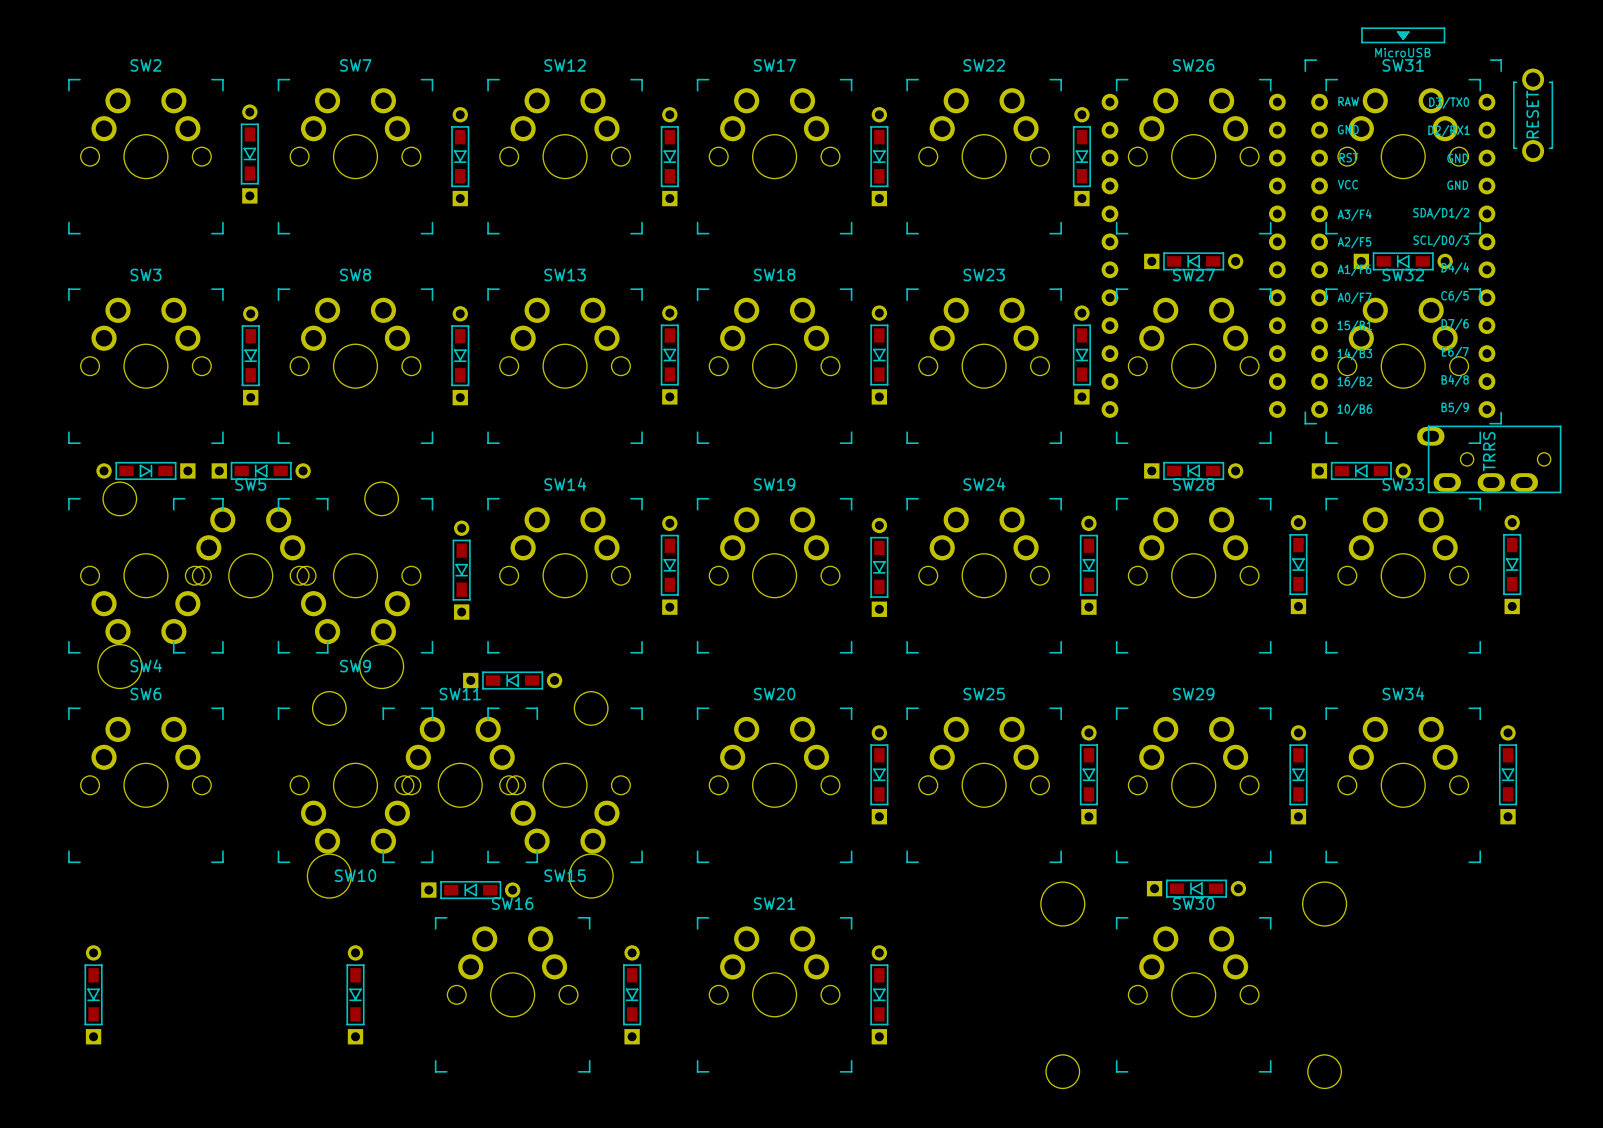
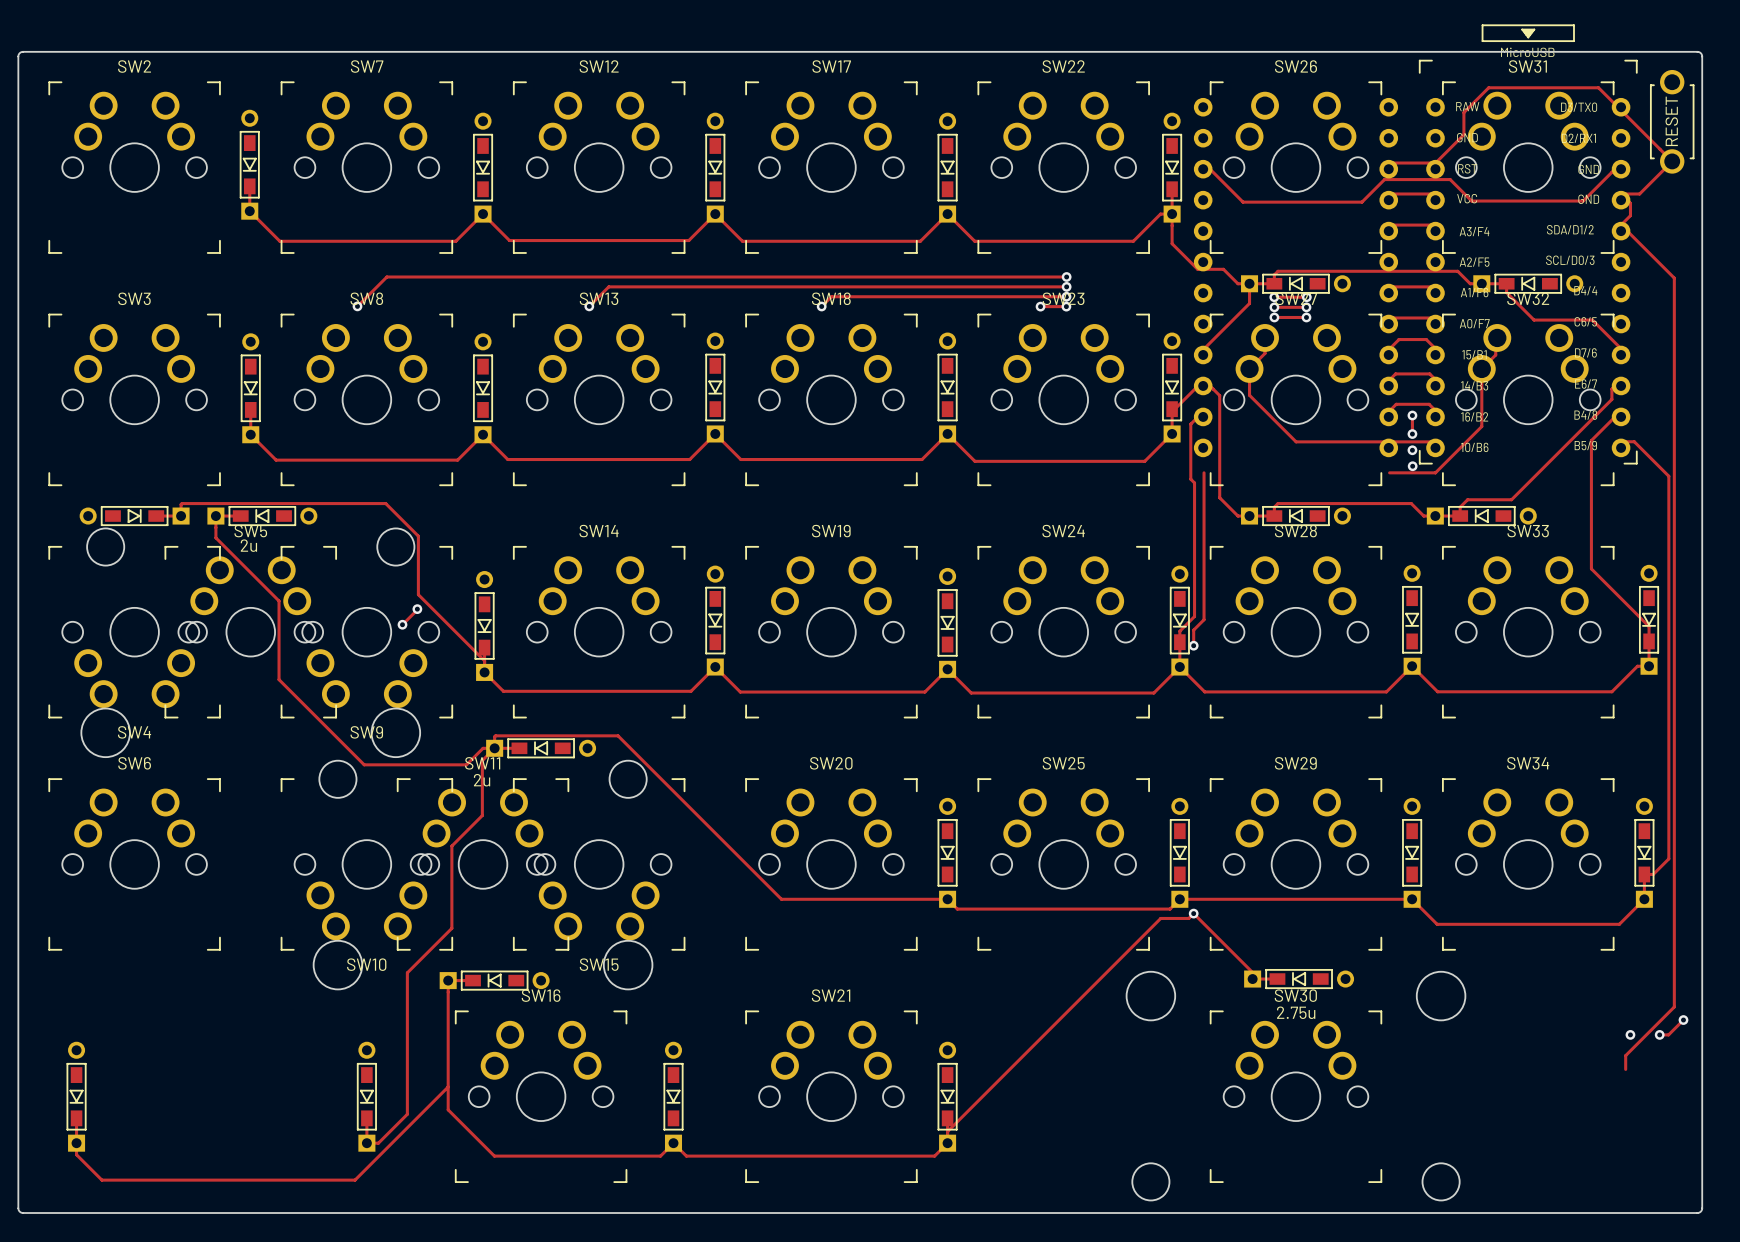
board edge: none -> (23, 51) (1700, 52) (1702, 56) (1701, 1211) (1697, 1213) (20, 1212) (18, 1208) (18, 56) (23, 51)
track: none -> (1389, 163) (1435, 163) (1463, 134) (1463, 112) (1488, 87) (1598, 87) (1672, 161) (1639, 193) (1621, 193) (1630, 203) (1630, 215) (1621, 224) (1674, 278) (1674, 1006) (1625, 1055) (1625, 1069)
track: none -> (1621, 163) (1583, 201) (1471, 201) (1450, 179) (1384, 179) (1361, 202) (1243, 202) (1204, 163)
track: none -> (249, 186) (249, 211) (279, 241) (455, 241) (483, 214) (509, 240) (688, 240) (715, 214) (742, 241) (920, 241) (947, 214) (974, 241) (1133, 241) (1160, 214) (1172, 214)
track: none -> (1172, 189) (1172, 243) (1197, 269) (1223, 269) (1237, 283) (1274, 283) (1274, 274) (1277, 271) (1457, 271) (1470, 283) (1506, 283) (1506, 292) (1534, 320) (1592, 320) (1621, 348)
track: none -> (1389, 193) (1435, 193)
track: none -> (1389, 225) (1435, 225)
track: none -> (1066, 277) (386, 277) (357, 306)
via: none -> (1066, 277)
track: none -> (1249, 283) (1249, 303) (1204, 348)
track: none -> (1066, 286) (608, 286) (589, 306)
via: none -> (1066, 286)
track: none -> (1389, 286) (1435, 286)
track: none -> (1066, 296) (831, 296) (821, 306)
via: none -> (1066, 296)
track: none -> (1274, 297) (1306, 297)
via: none -> (1274, 297)
via: none -> (1306, 297)
via: none -> (357, 306)
via: none -> (589, 306)
via: none -> (821, 306)
track: none -> (1040, 306) (1066, 306)
via: none -> (1040, 306)
via: none -> (1066, 306)
track: none -> (1274, 307) (1306, 307)
via: none -> (1274, 307)
via: none -> (1306, 307)
track: none -> (1274, 317) (1306, 317)
via: none -> (1274, 317)
via: none -> (1306, 317)
track: none -> (1389, 317) (1435, 317)
track: none -> (1265, 337) (1265, 353) (1249, 368) (1249, 395) (1296, 441) (1435, 441)
track: none -> (1497, 337) (1495, 354) (1481, 368) (1481, 426) (1435, 472) (1389, 472)
track: none -> (1435, 348) (1426, 339) (1399, 339) (1389, 348)
track: none -> (1435, 379) (1429, 373) (1395, 373) (1389, 379)
track: none -> (1621, 379) (1611, 389) (1611, 399) (1511, 499) (1467, 499) (1460, 507) (1460, 516) (1423, 516) (1411, 503) (1277, 503) (1274, 507) (1274, 516) (1237, 516) (1219, 497) (1219, 395) (1204, 379) (1174, 409) (1172, 409) (1172, 433) (1144, 461) (974, 461) (947, 433) (922, 459) (740, 459) (715, 433) (689, 459) (507, 459) (483, 434) (457, 460) (276, 460) (250, 434) (250, 409)
track: none -> (1435, 410) (1429, 404) (1396, 404) (1389, 410)
track: none -> (1621, 410) (1591, 440) (1591, 568) (1649, 626) (1649, 666) (1637, 666) (1611, 691) (1437, 691) (1412, 666) (1386, 691) (1204, 691) (1179, 667)
track: none -> (1204, 410) (1190, 424) (1190, 479) (1194, 482) (1194, 616) (1179, 631) (1179, 667)
track: none -> (1412, 415) (1412, 434)
via: none -> (1412, 415)
via: none -> (1412, 434)
track: none -> (1621, 441) (1634, 441) (1668, 476) (1668, 858) (1653, 874) (1644, 874) (1644, 899) (1619, 924) (1437, 924) (1412, 899) (1179, 899) (1170, 909) (957, 909) (947, 899) (781, 899) (618, 735) (495, 735) (494, 748) (482, 760) (482, 815) (451, 846) (451, 928) (407, 972) (407, 1114) (378, 1143) (366, 1143) (366, 1118)
via: none -> (1412, 450)
via: none -> (1412, 466)
track: none -> (1204, 472) (1204, 619) (1193, 630) (1193, 645)
part: (1489, 459) -> none
track: none -> (156, 516) (181, 516) (181, 503) (385, 503) (418, 536) (418, 594) (484, 660)
track: none -> (240, 516) (215, 516) (215, 537) (279, 601) (279, 679) (364, 764) (466, 764) (483, 748) (519, 748)
text: none -> 2u (248, 545)
track: none -> (417, 609) (402, 624)
via: none -> (417, 609)
via: none -> (402, 624)
via: none -> (1193, 645)
track: none -> (484, 647) (484, 672) (503, 691) (691, 691) (715, 667) (740, 692) (924, 692) (947, 669) (971, 693) (1153, 693) (1179, 667)
text: none -> 2u (482, 780)
via: none -> (1193, 913)
track: none -> (1277, 979) (1252, 979) (1252, 972) (1193, 913) (1188, 918) (1160, 918) (947, 1131)
track: none -> (473, 980) (448, 980) (448, 1109) (494, 1156) (660, 1156) (673, 1143) (686, 1156) (934, 1156) (947, 1143) (947, 1118)
text: none -> 2.75u (1296, 1012)
track: none -> (1683, 1020) (1668, 1034) (1659, 1034)
via: none -> (1683, 1020)
via: none -> (1630, 1034)
via: none -> (1659, 1034)
track: none -> (448, 1086) (355, 1180) (101, 1180) (76, 1154) (76, 1118)

